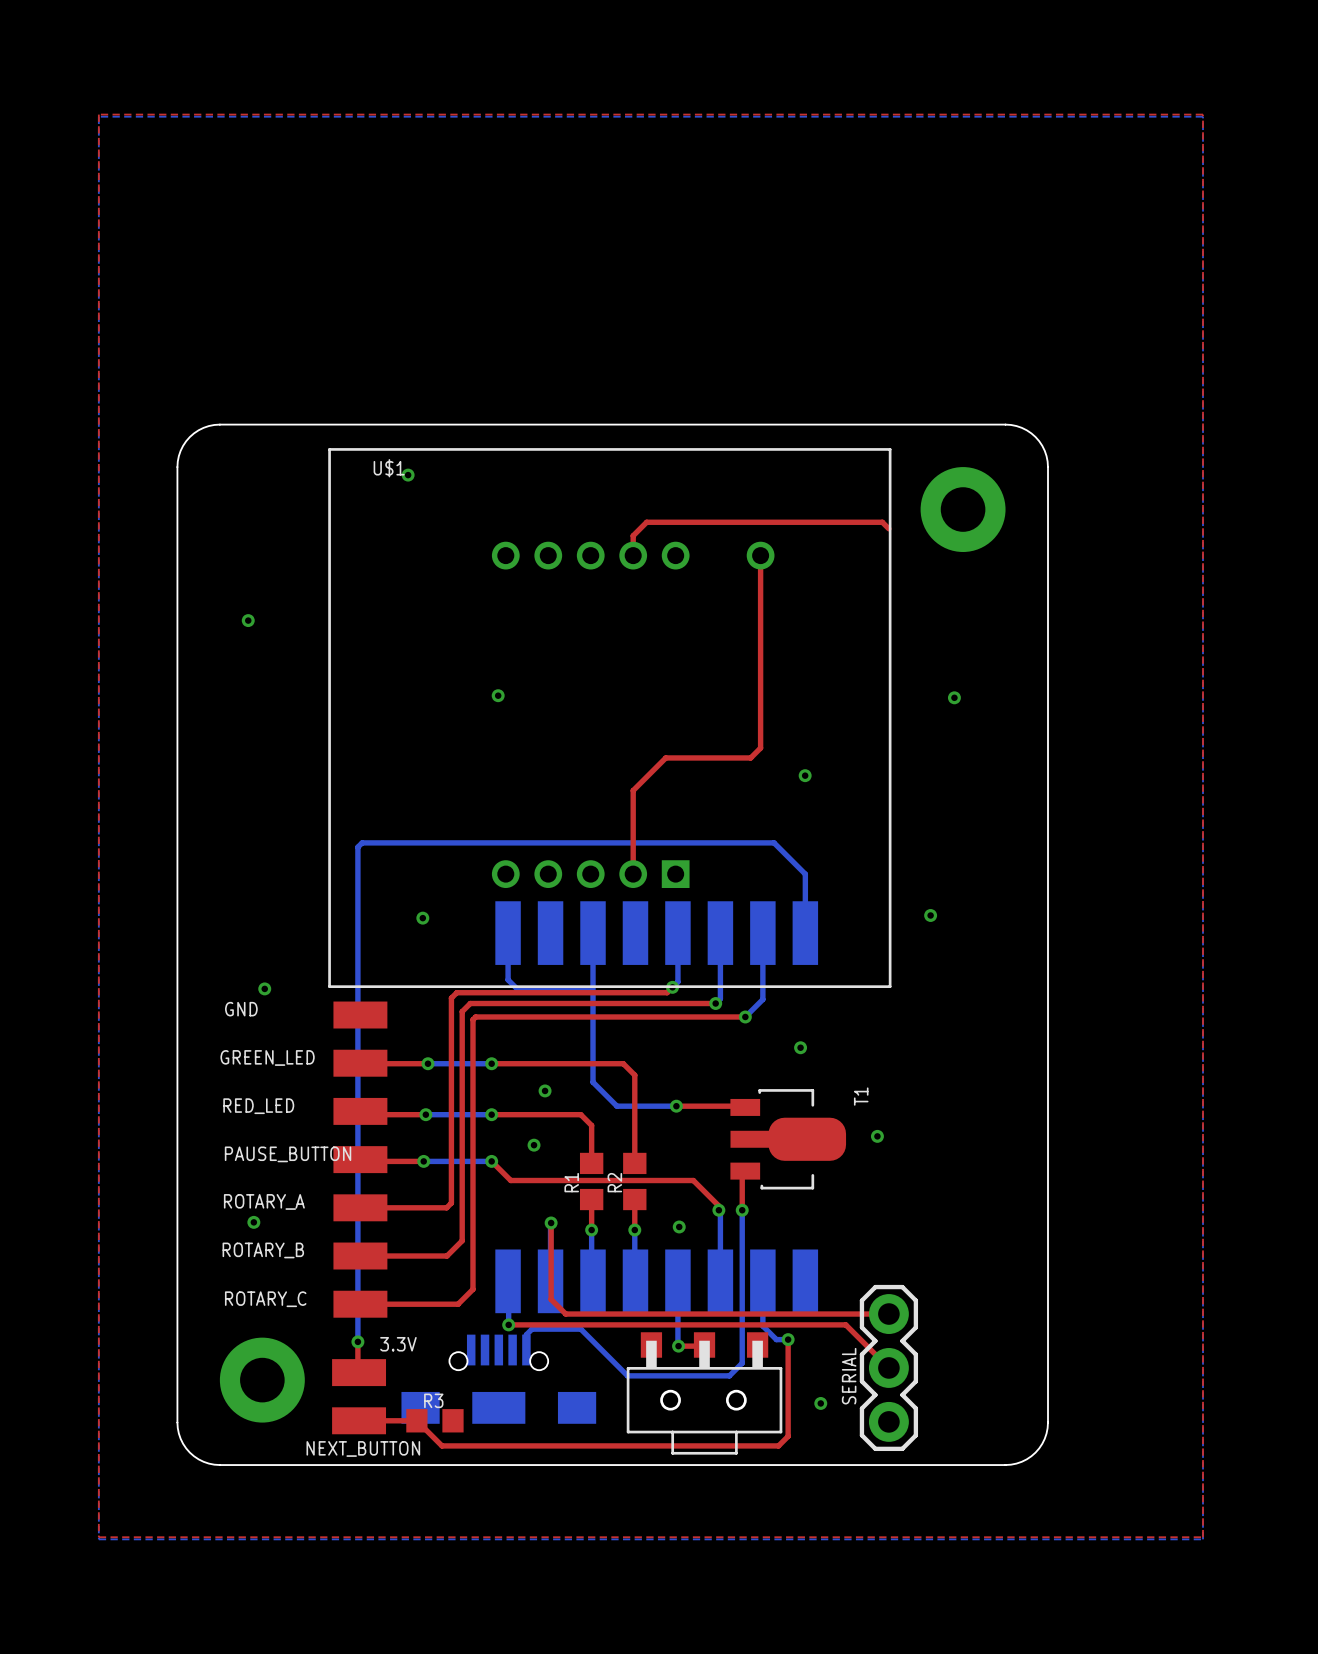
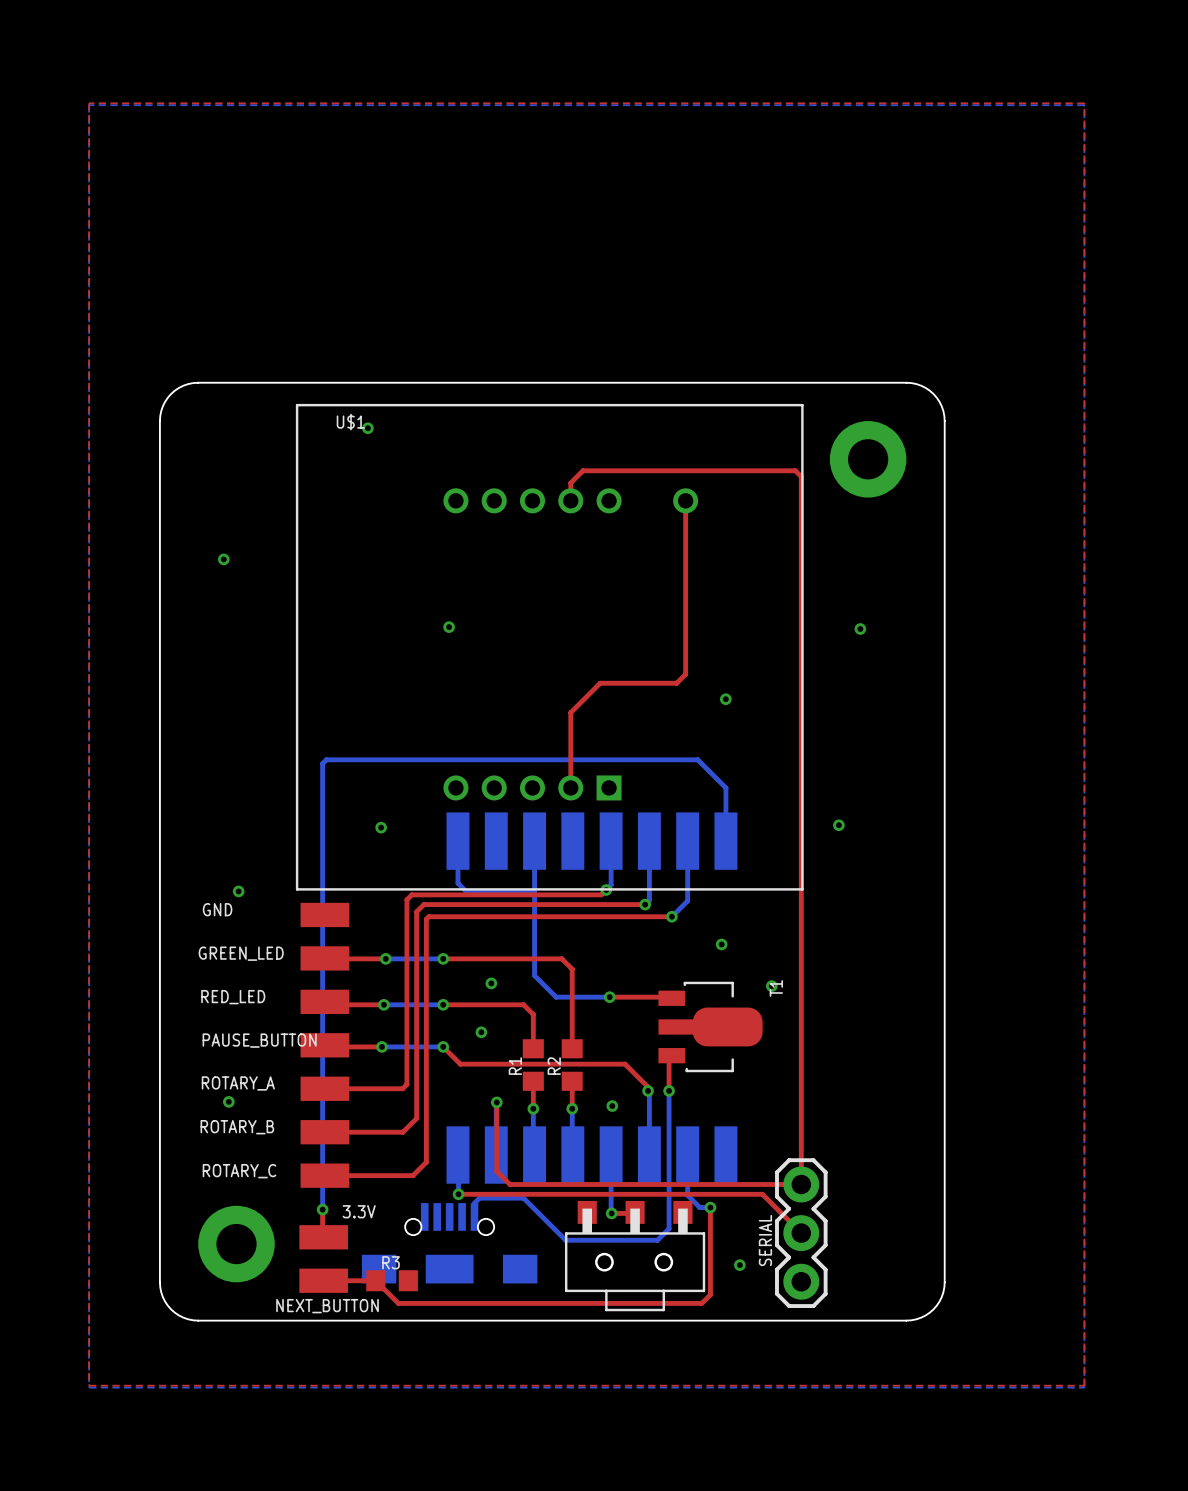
top track: none -> (801, 476) (801, 1184)
via position: (877, 1136) -> (771, 986)

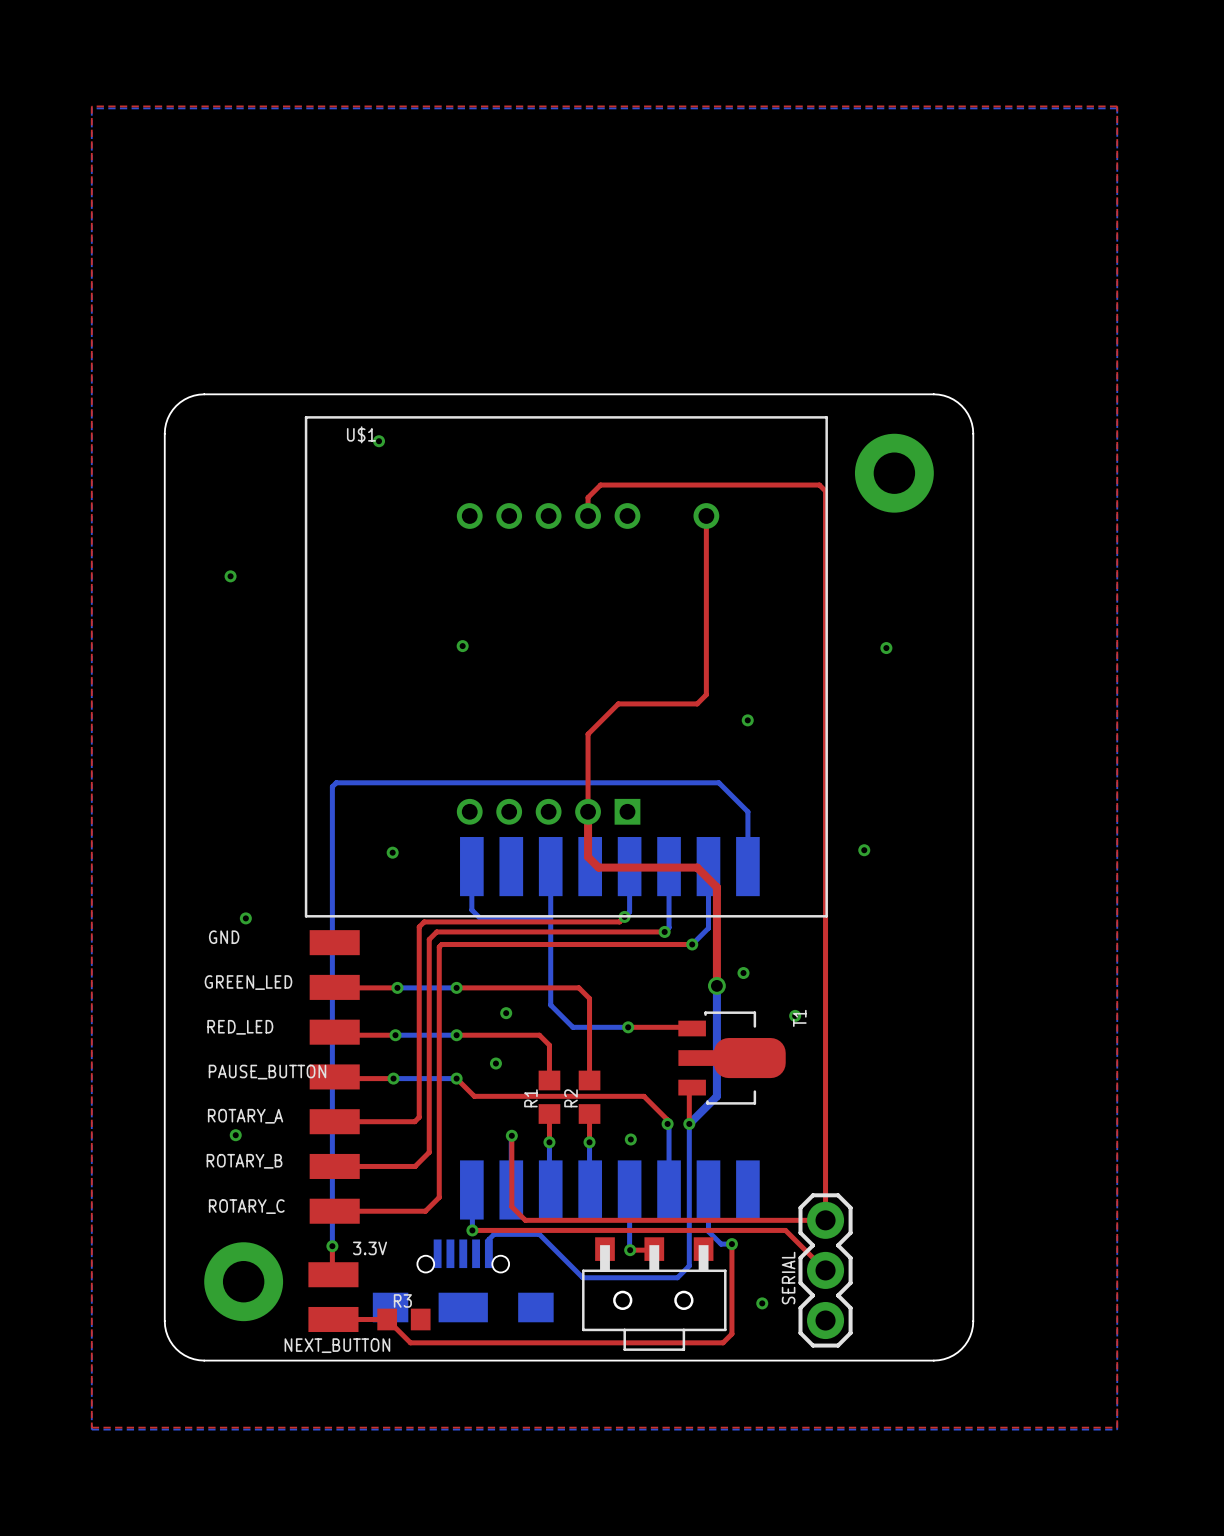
top track: none -> (588, 811) (588, 857) (598, 867) (697, 867) (716, 887) (716, 985)
bottom track: none -> (716, 985) (716, 1096) (689, 1123)
via: none -> (716, 985)

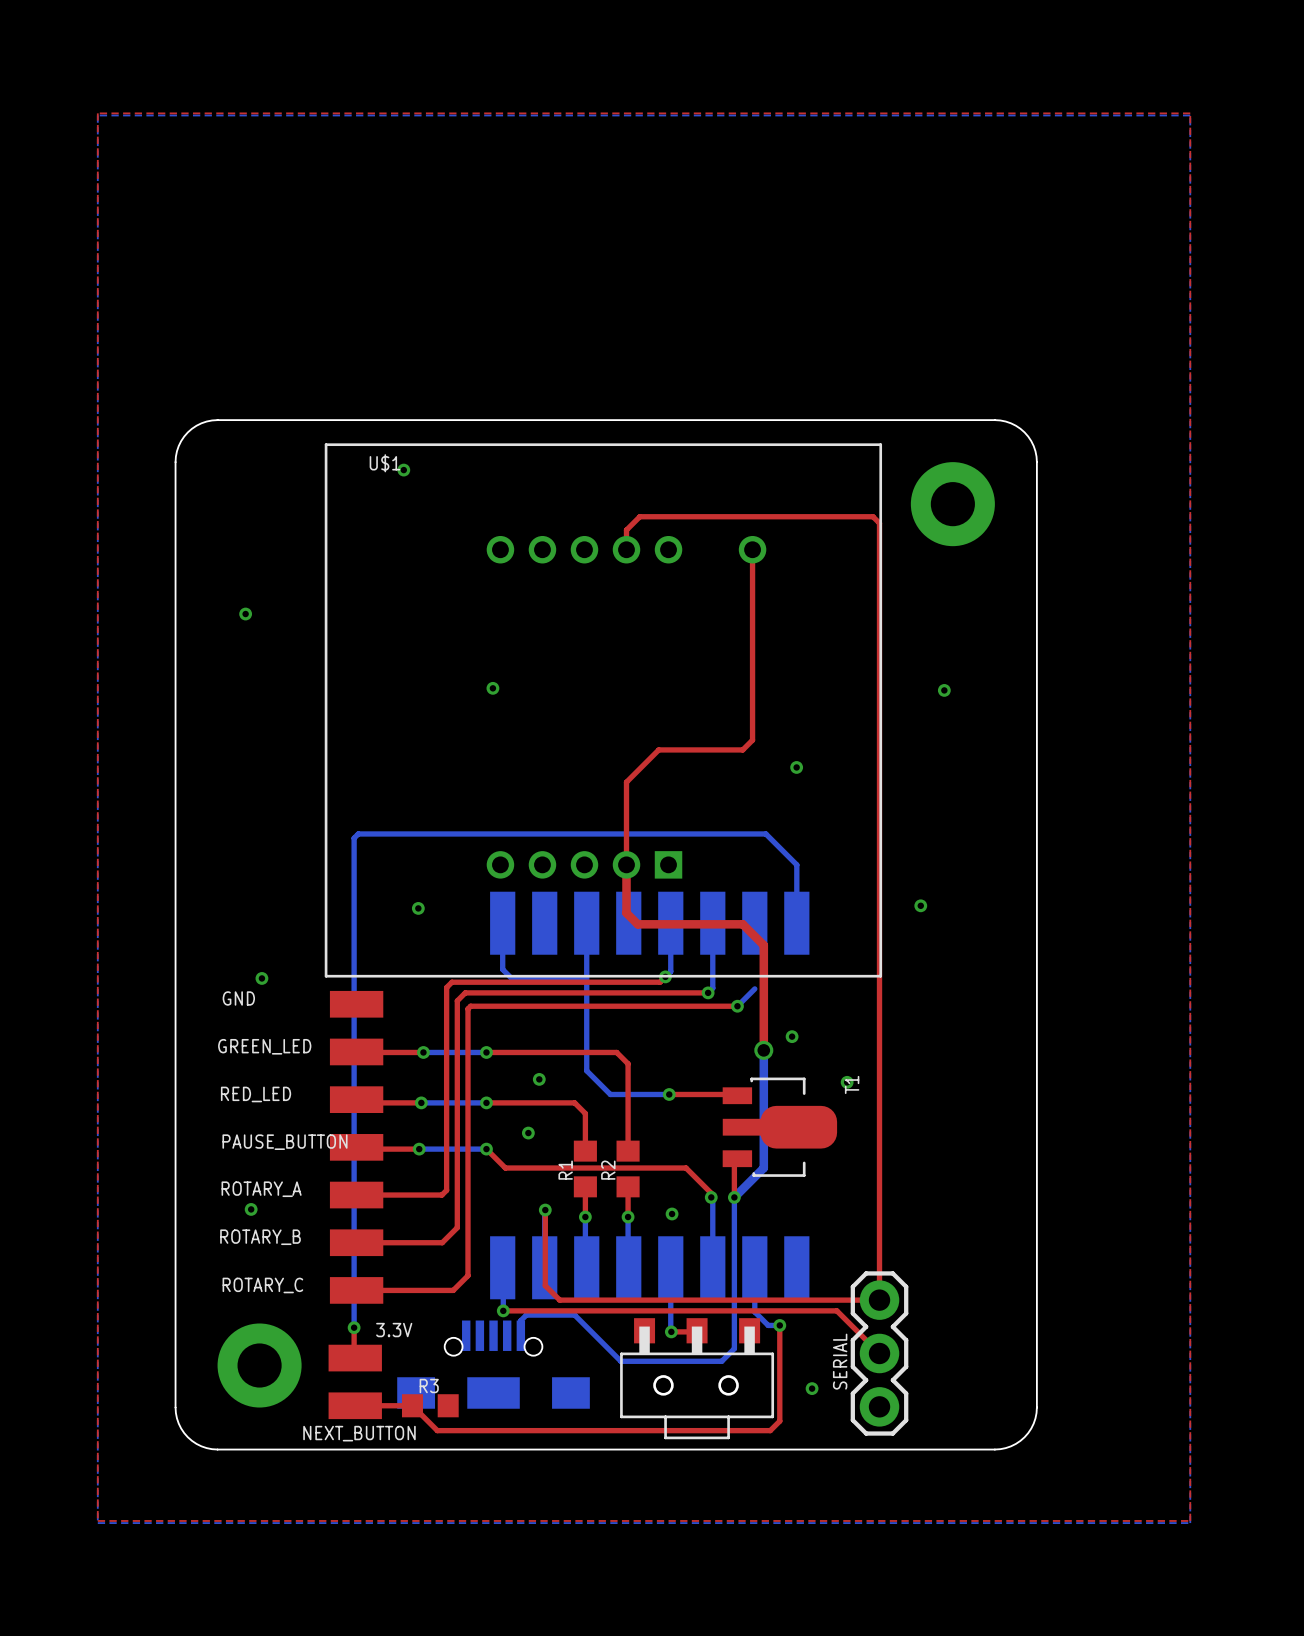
bottom track: (708, 866) (708, 928) -> none

